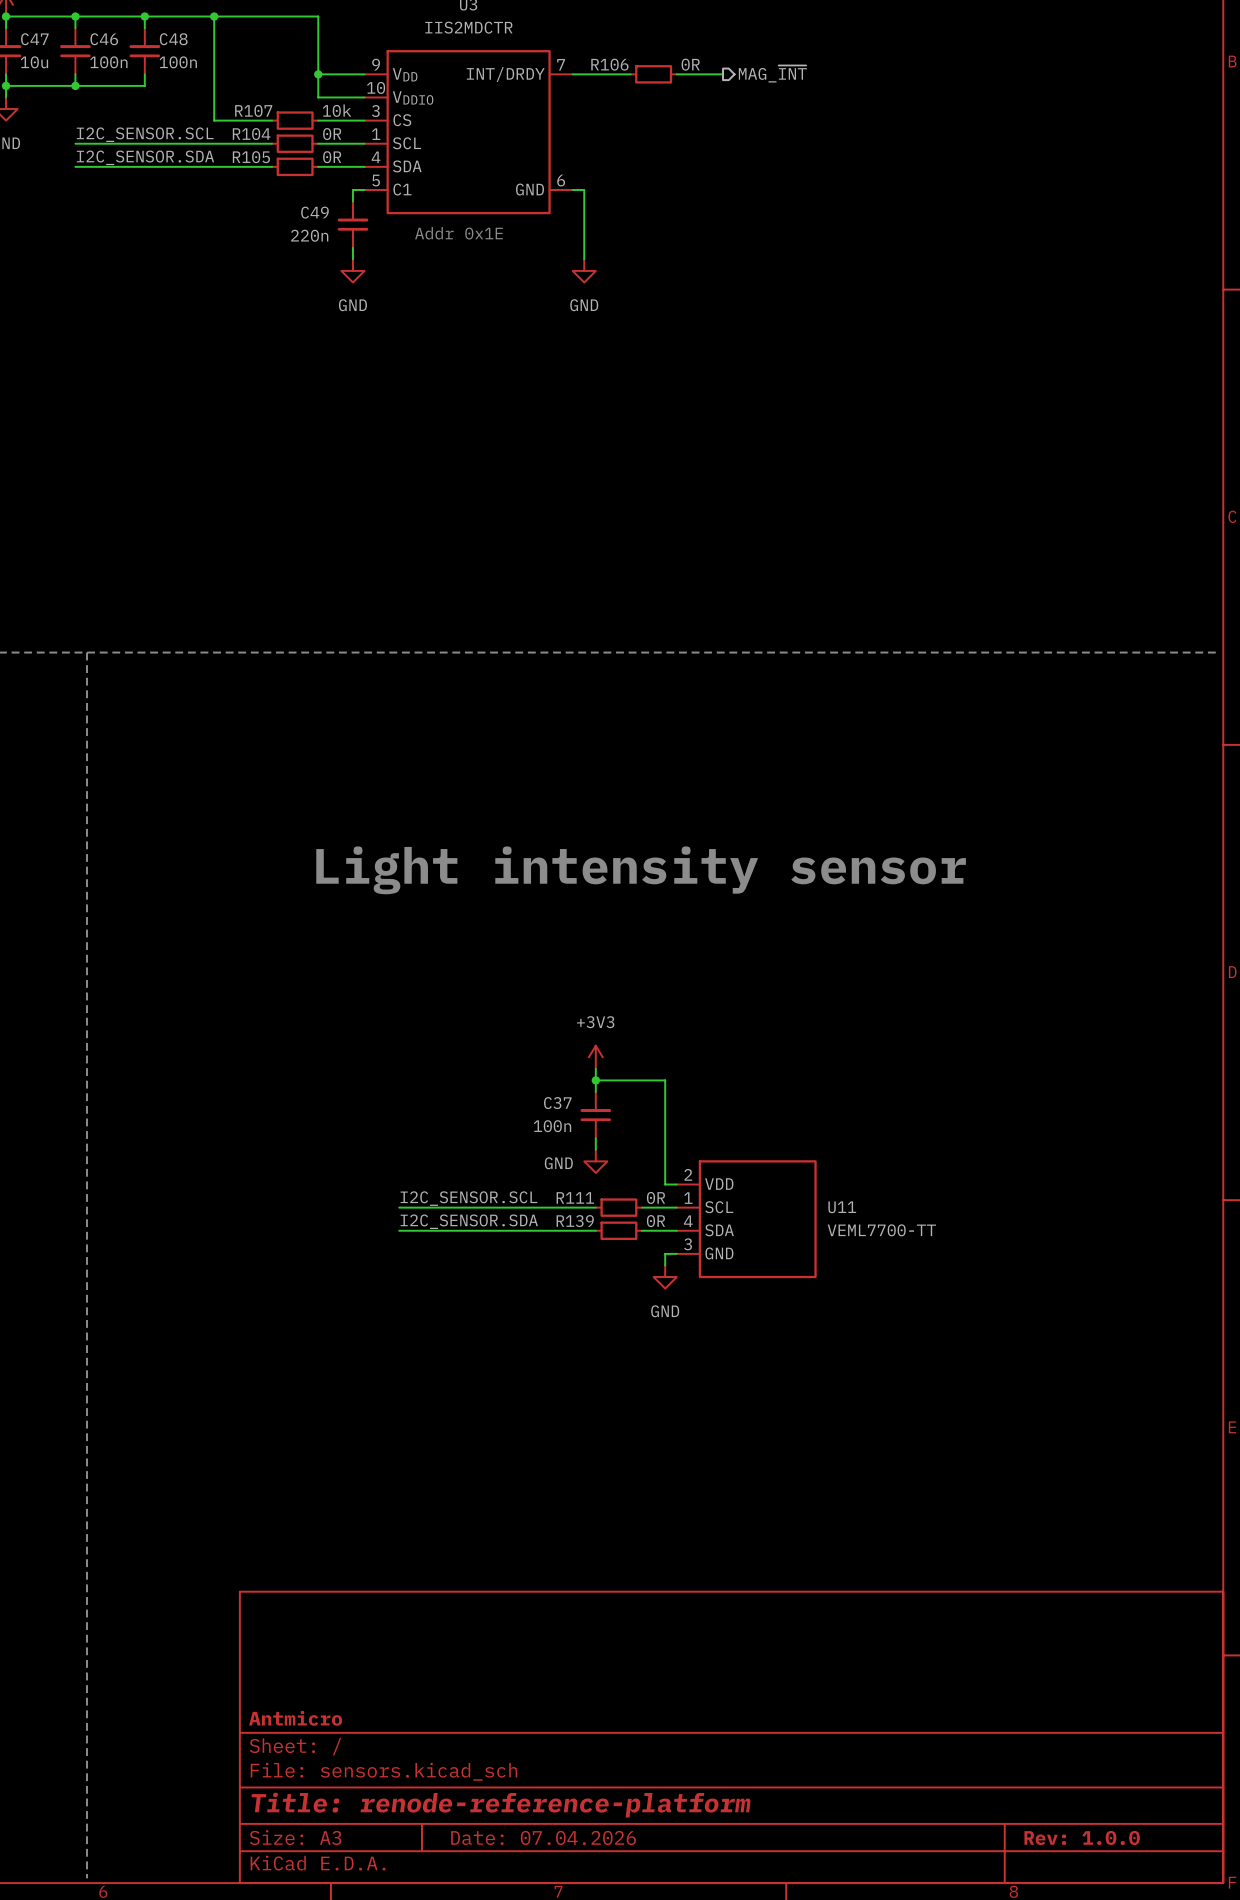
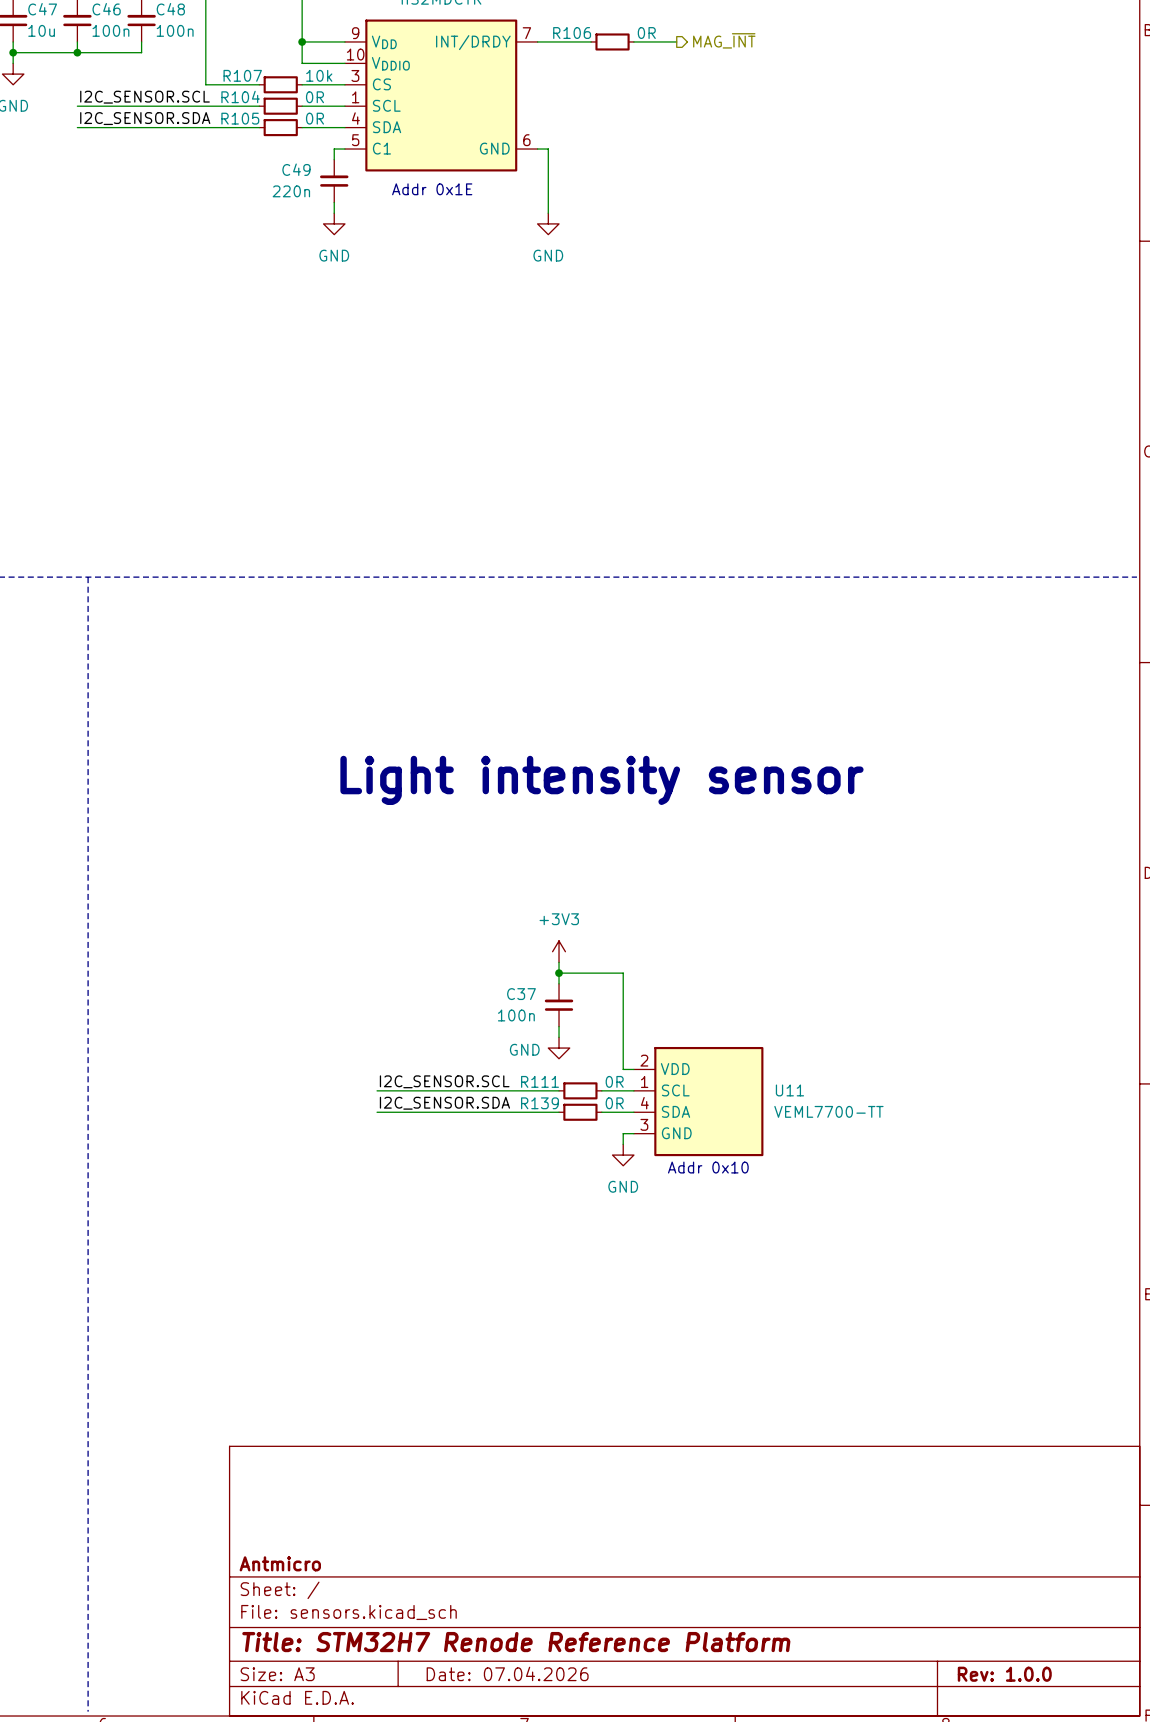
text: none -> Addr 0x10 (708, 1167)
title block: Title: renode-reference-platform (501, 1805) -> Title: STM32H7 Renode Reference Platform (516, 1642)

